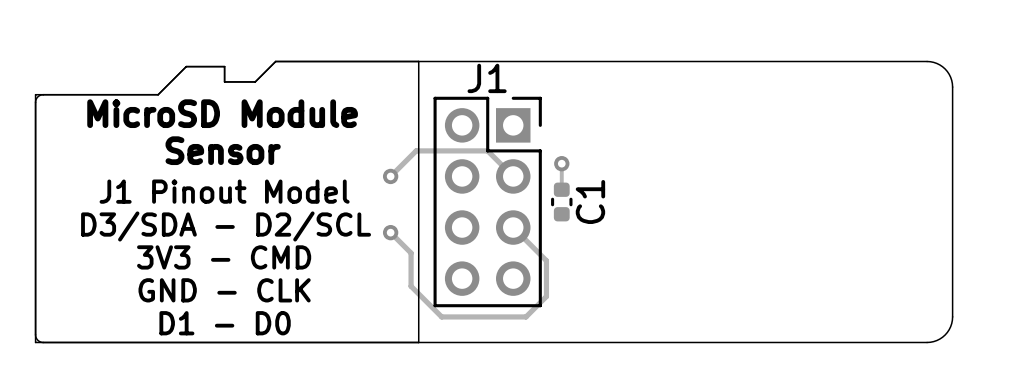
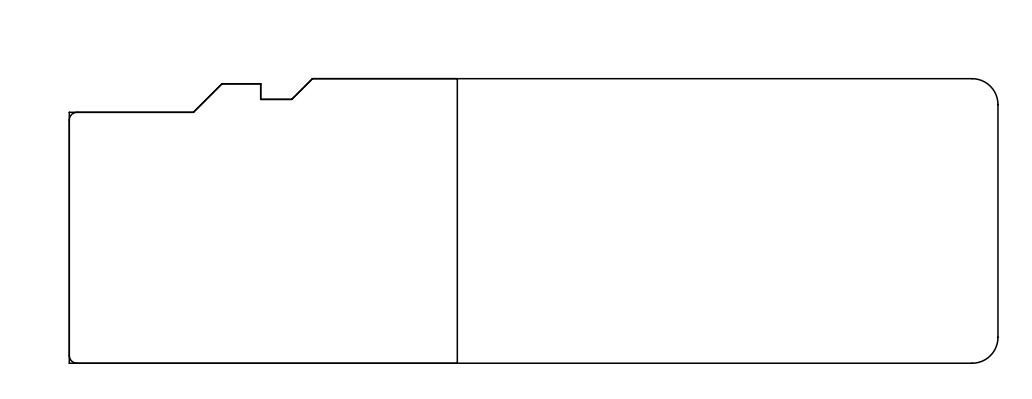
text: MicroSD Module (222, 113) -> none
text: Sensor (223, 150) -> none
track: (561, 163) (561, 189) -> none
via: (561, 163) -> none
track: (390, 176) (416, 150) (487, 150) (513, 176) -> none
via: (390, 176) -> none
text: J1 Pinout Model (224, 191) -> none
J1: (487, 201) -> none
C1: (561, 201) -> none
text: D3/SDA - D2/SCL (226, 226) -> none
track: (513, 227) (546, 260) (546, 296) (526, 316) (441, 316) (411, 286) (411, 253) (390, 232) -> none
via: (390, 232) -> none
text: 3V3 - CMD (224, 257) -> none
text: GND - CLK (224, 290) -> none
text: D1 - D0 (225, 323) -> none

